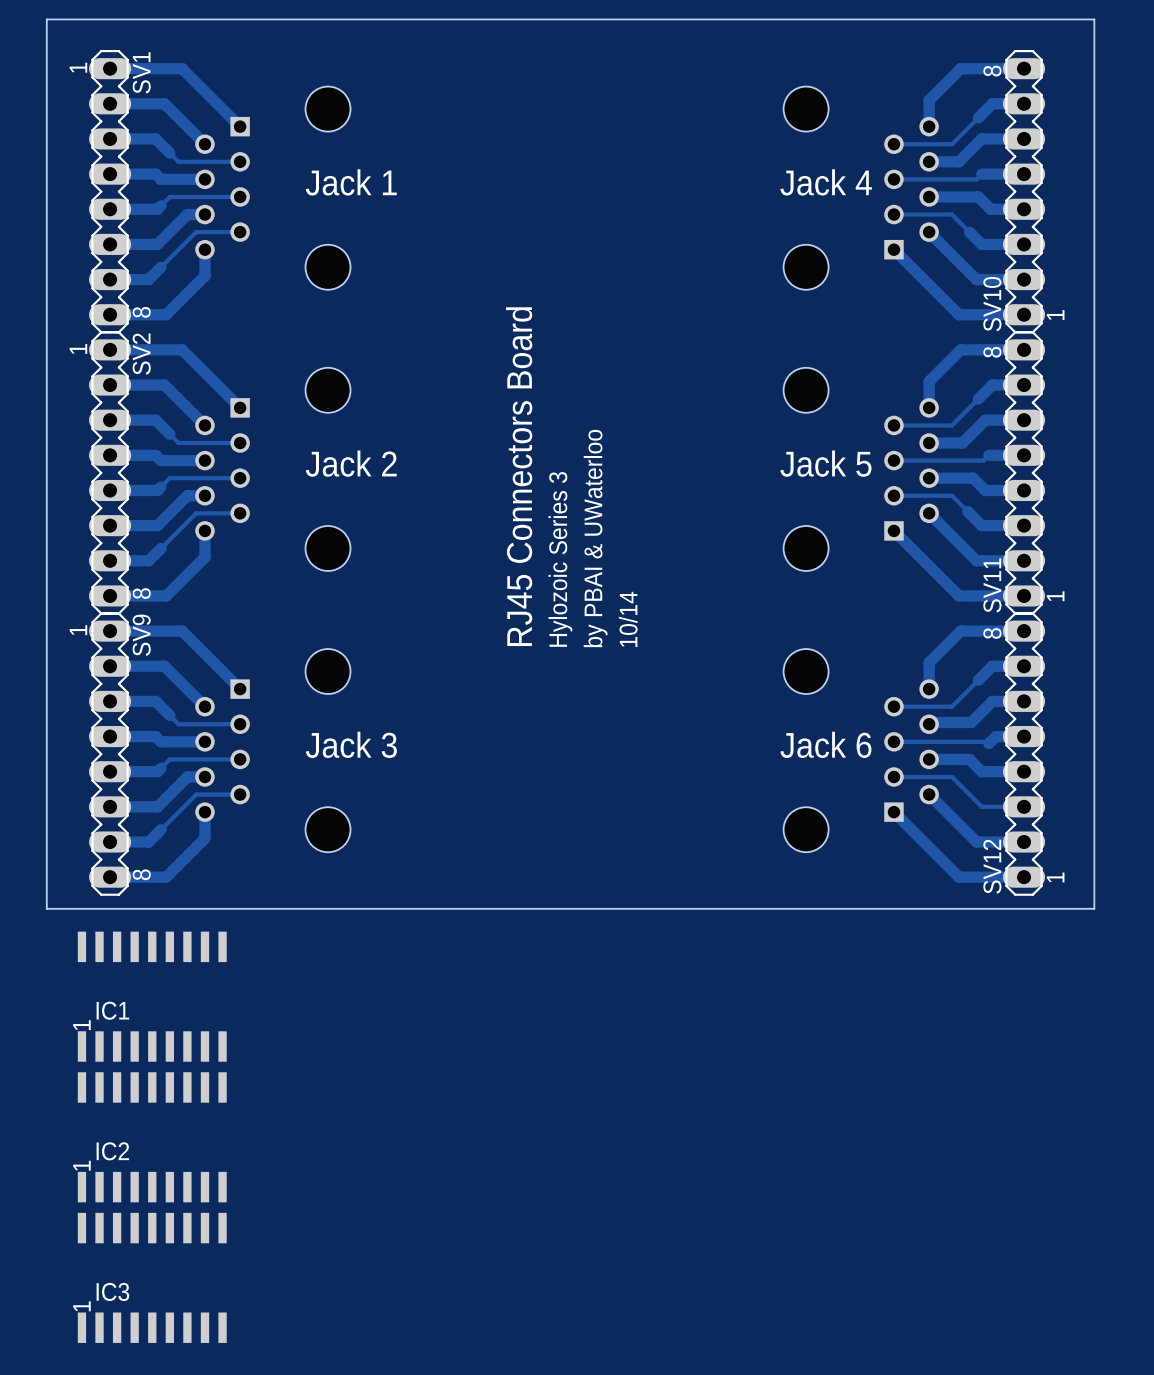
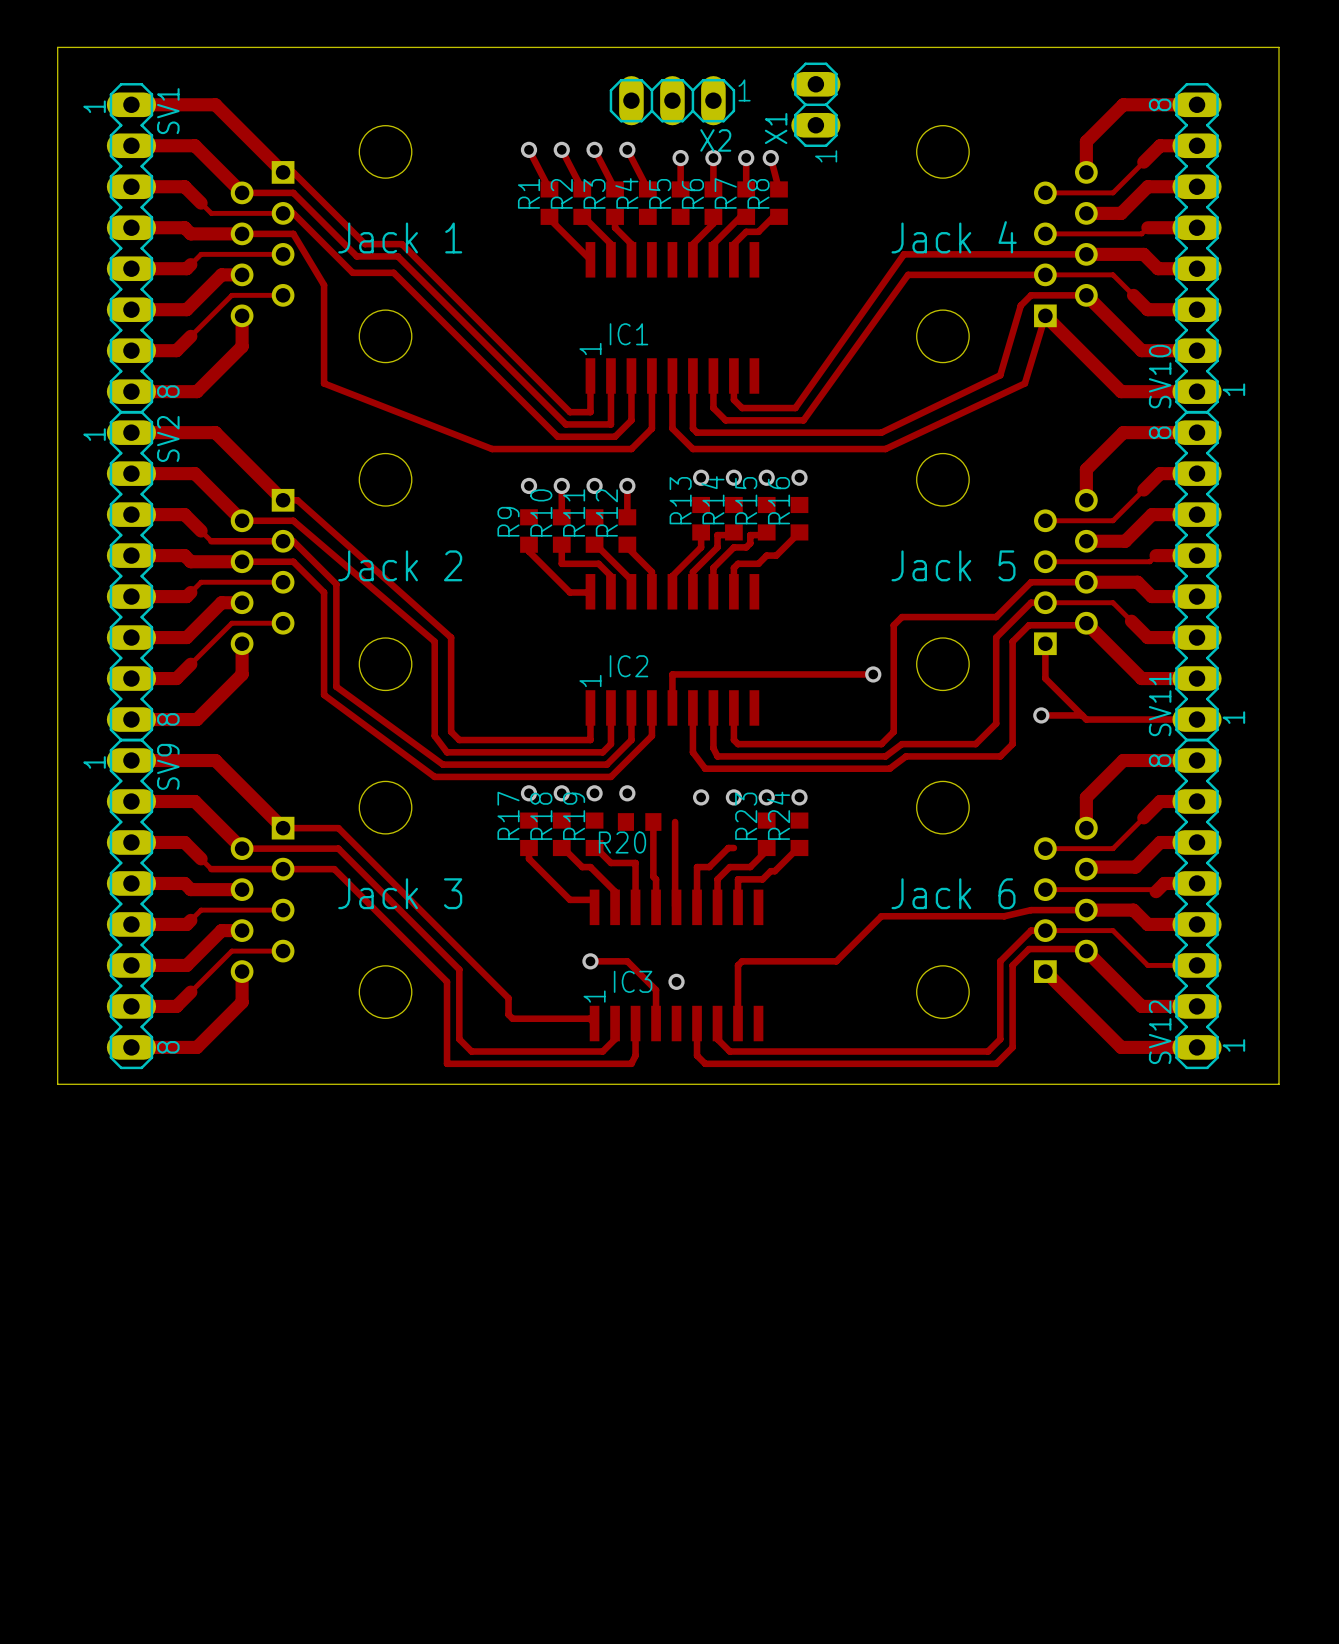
X2: none -> (672, 100)
X1: none -> (815, 104)
track: none -> (528, 149) (549, 189)
via: none -> (528, 149)
track: none -> (561, 149) (582, 189)
via: none -> (561, 149)
track: none -> (594, 149) (615, 189)
via: none -> (594, 149)
track: none -> (627, 149) (647, 189)
via: none -> (627, 149)
track: none -> (680, 158) (680, 189)
via: none -> (680, 158)
track: none -> (713, 158) (713, 189)
via: none -> (713, 158)
track: none -> (746, 158) (746, 189)
via: none -> (746, 158)
track: none -> (770, 158) (778, 189)
via: none -> (770, 158)
track: none -> (283, 172) (293, 172) (365, 244) (401, 244) (569, 412) (590, 412) (590, 375)
track: none -> (242, 192) (293, 192) (356, 256) (397, 256) (565, 424) (610, 424) (610, 375)
R1: none -> (549, 203)
R2: none -> (582, 203)
R3: none -> (615, 203)
R4: none -> (647, 203)
R5: none -> (680, 203)
R6: none -> (713, 203)
R7: none -> (746, 203)
R8: none -> (778, 203)
track: none -> (283, 213) (293, 213) (352, 272) (393, 272) (557, 436) (615, 436) (631, 420) (631, 375)
track: none -> (549, 216) (590, 259)
track: none -> (582, 216) (610, 244) (610, 259)
track: none -> (615, 216) (615, 227) (631, 244) (631, 259)
track: none -> (713, 216) (713, 223) (692, 244) (692, 259)
track: none -> (746, 216) (740, 216) (713, 244) (713, 259)
track: none -> (778, 216) (773, 216) (758, 231) (746, 231) (733, 244) (733, 259)
track: none -> (242, 233) (293, 233) (324, 285) (324, 383) (492, 449) (631, 449) (651, 428) (651, 375)
track: none -> (1086, 254) (903, 254) (795, 408) (742, 408) (733, 399) (733, 375)
track: none -> (1045, 274) (908, 274) (803, 420) (725, 420) (713, 408) (713, 375)
track: none -> (1086, 295) (1031, 295) (1020, 305) (1000, 375) (881, 432) (697, 432) (692, 428) (692, 375)
track: none -> (1045, 315) (1024, 383) (885, 449) (692, 449) (672, 428) (672, 375)
via: none -> (701, 477)
via: none -> (733, 477)
via: none -> (766, 477)
via: none -> (799, 477)
via: none -> (528, 485)
track: none -> (561, 485) (561, 517)
via: none -> (561, 485)
via: none -> (594, 485)
track: none -> (627, 485) (627, 517)
via: none -> (627, 485)
track: none -> (283, 500) (297, 500) (451, 637) (451, 731) (459, 740) (590, 740) (590, 707)
R13: none -> (701, 518)
R14: none -> (733, 518)
R15: none -> (766, 518)
R16: none -> (799, 518)
track: none -> (242, 520) (293, 520) (434, 641) (434, 735) (447, 752) (602, 752) (610, 744) (610, 707)
R9: none -> (528, 531)
R10: none -> (561, 531)
R11: none -> (594, 531)
R12: none -> (627, 531)
track: none -> (701, 532) (701, 547) (672, 576) (672, 591)
track: none -> (733, 532) (731, 535) (717, 535) (717, 547) (692, 572) (692, 591)
track: none -> (766, 532) (764, 535) (750, 535) (750, 543) (746, 547) (733, 547) (713, 567) (713, 591)
track: none -> (799, 532) (776, 555) (766, 555) (758, 563) (738, 563) (733, 567) (733, 591)
track: none -> (211, 541) (293, 541) (336, 584) (336, 686) (442, 764) (606, 764) (631, 740) (631, 707)
track: none -> (528, 544) (528, 551) (569, 592) (590, 591)
track: none -> (561, 544) (561, 563) (598, 563) (610, 576) (610, 591)
track: none -> (594, 544) (631, 580) (631, 591)
track: none -> (627, 544) (627, 547) (651, 572) (651, 591)
track: none -> (190, 561) (293, 561) (324, 592) (324, 694) (434, 776) (610, 776) (651, 735) (651, 707)
text: RJ45 Connectors Board (519, 476) -> none
track: none -> (1086, 582) (1031, 582) (996, 617) (901, 617) (893, 625) (893, 731) (881, 744) (738, 744) (733, 740) (733, 707)
track: none -> (1045, 602) (1031, 602) (996, 637) (996, 723) (975, 744) (901, 744) (885, 756) (717, 756) (713, 748) (713, 707)
track: (893, 530) (959, 595) -> (1045, 643) (1045, 678) (1086, 719) (1121, 719)
text: by PBAI & UWaterloo (595, 538) -> none
track: none -> (873, 674) (672, 674) (672, 707)
via: none -> (873, 674)
text: Hylozoic Series 3 (560, 559) -> none
track: none -> (1141, 678) (1082, 617) (1082, 625) (1028, 625) (1012, 641) (1012, 744) (1000, 756) (906, 756) (889, 768) (705, 768) (692, 752) (692, 707)
track: none -> (1041, 715) (1082, 715)
via: none -> (1041, 715)
track width: thick (959, 595) (1024, 595) -> thin (1121, 719) (1197, 719)
text: 10/14 (628, 619) -> none
via: none -> (528, 793)
via: none -> (561, 793)
via: none -> (594, 793)
via: none -> (627, 793)
via: none -> (701, 797)
via: none -> (733, 797)
via: none -> (766, 797)
via: none -> (799, 797)
R20: none -> (639, 822)
track: none -> (653, 822) (653, 876) (656, 879) (656, 907)
track: none -> (675, 822) (676, 907)
track: none -> (283, 828) (338, 828) (508, 998) (508, 1014) (512, 1018) (589, 1018) (594, 1023)
R17: none -> (528, 834)
R18: none -> (561, 834)
R19: none -> (594, 834)
R23: none -> (766, 834)
R24: none -> (799, 834)
track: none -> (242, 848) (338, 848) (459, 969) (459, 1039) (471, 1051) (602, 1051) (615, 1039) (615, 1023)
track: none -> (528, 848) (528, 858) (569, 899) (594, 899) (594, 916)
track: none -> (561, 848) (582, 867) (590, 867) (615, 891) (615, 907)
track: none -> (594, 848) (610, 862) (635, 862) (635, 907)
track: none -> (733, 848) (728, 848) (709, 867) (697, 867) (697, 907)
track: none -> (766, 848) (766, 850) (750, 867) (729, 867) (717, 879) (717, 907)
track: none -> (799, 848) (774, 871) (770, 871) (762, 879) (738, 879) (738, 907)
track: none -> (211, 869) (334, 869) (447, 981) (447, 1063) (631, 1063) (635, 1055) (635, 1023)
track: none -> (1086, 910) (1031, 910) (1004, 916) (881, 916) (836, 961) (742, 961) (738, 965) (738, 1023)
track: none -> (1045, 930) (1031, 930) (1000, 961) (1000, 1039) (988, 1051) (729, 1051) (717, 1039) (717, 1023)
track: none -> (590, 961) (627, 961) (656, 990) (656, 1023)
via: none -> (590, 961)
via: none -> (676, 981)
track: none -> (1141, 1006) (1086, 949) (1028, 949) (1012, 965) (1012, 1047) (996, 1063) (705, 1063) (697, 1055) (697, 1023)
IC1 position: (152, 996) -> (672, 317)
IC2 position: (152, 1137) -> (672, 649)
IC3 position: (152, 1277) -> (676, 965)

